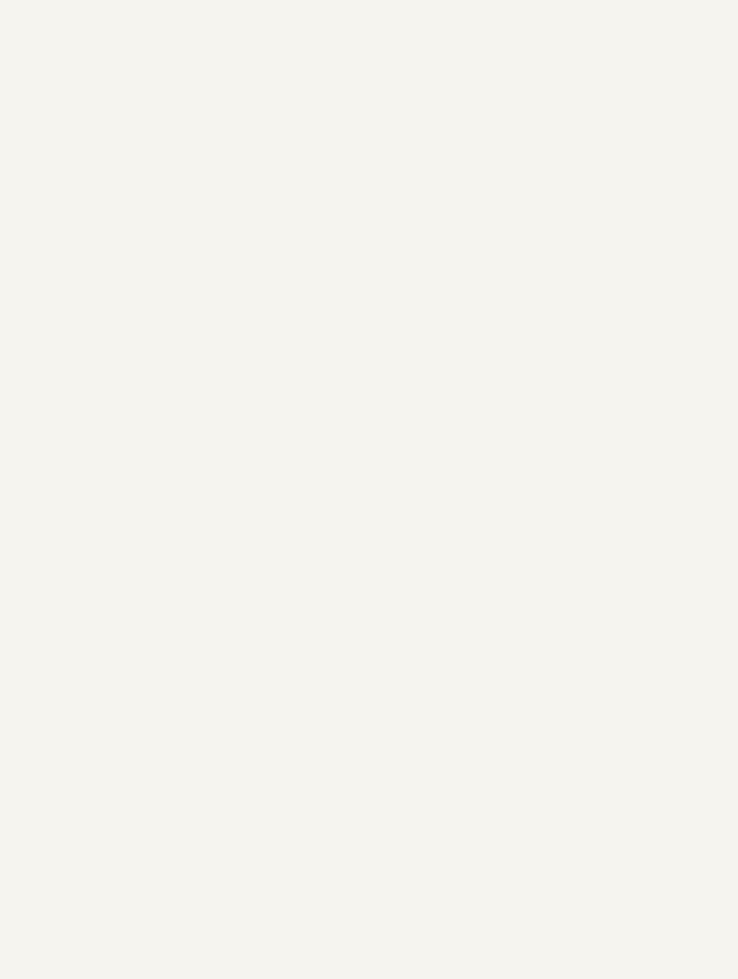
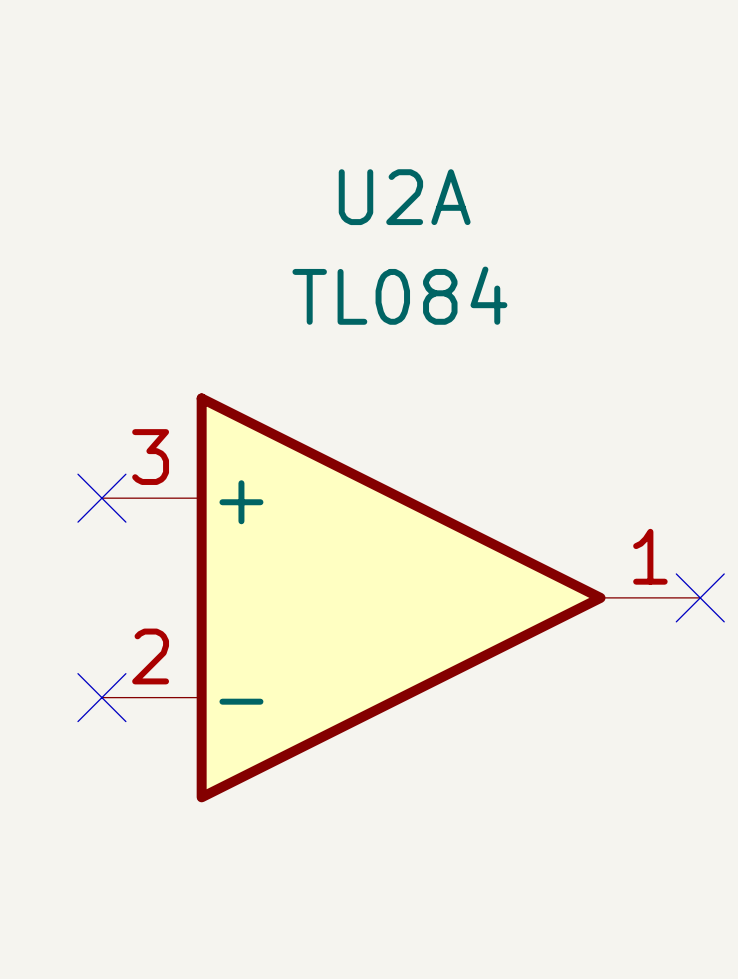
no-connect mark: none -> (101, 498)
U2A: none -> TL084 (401, 597)
no-connect mark: none -> (700, 597)
no-connect mark: none -> (101, 697)

